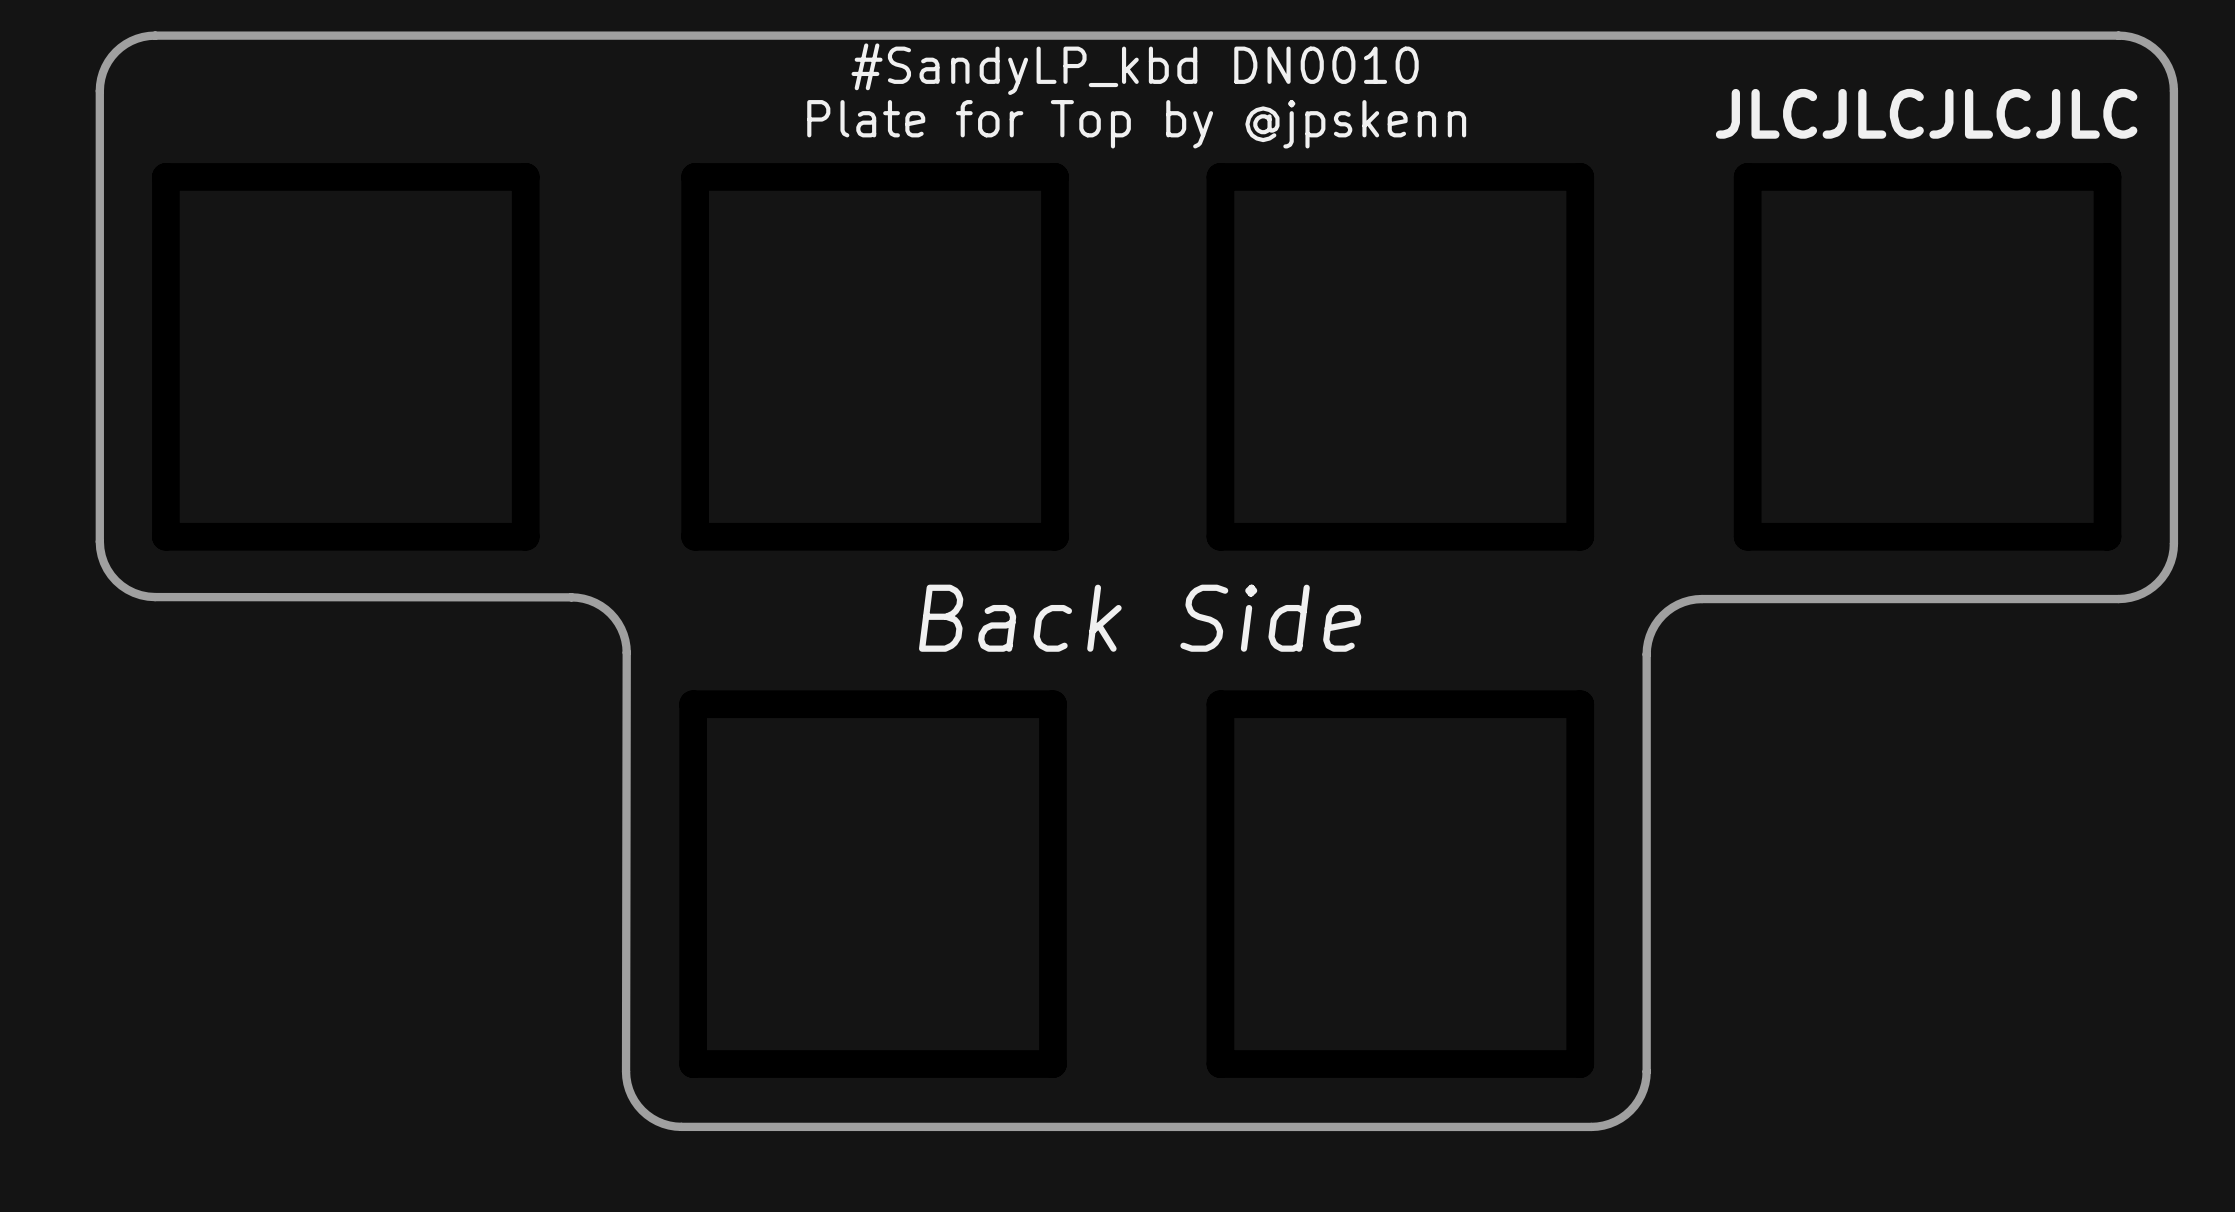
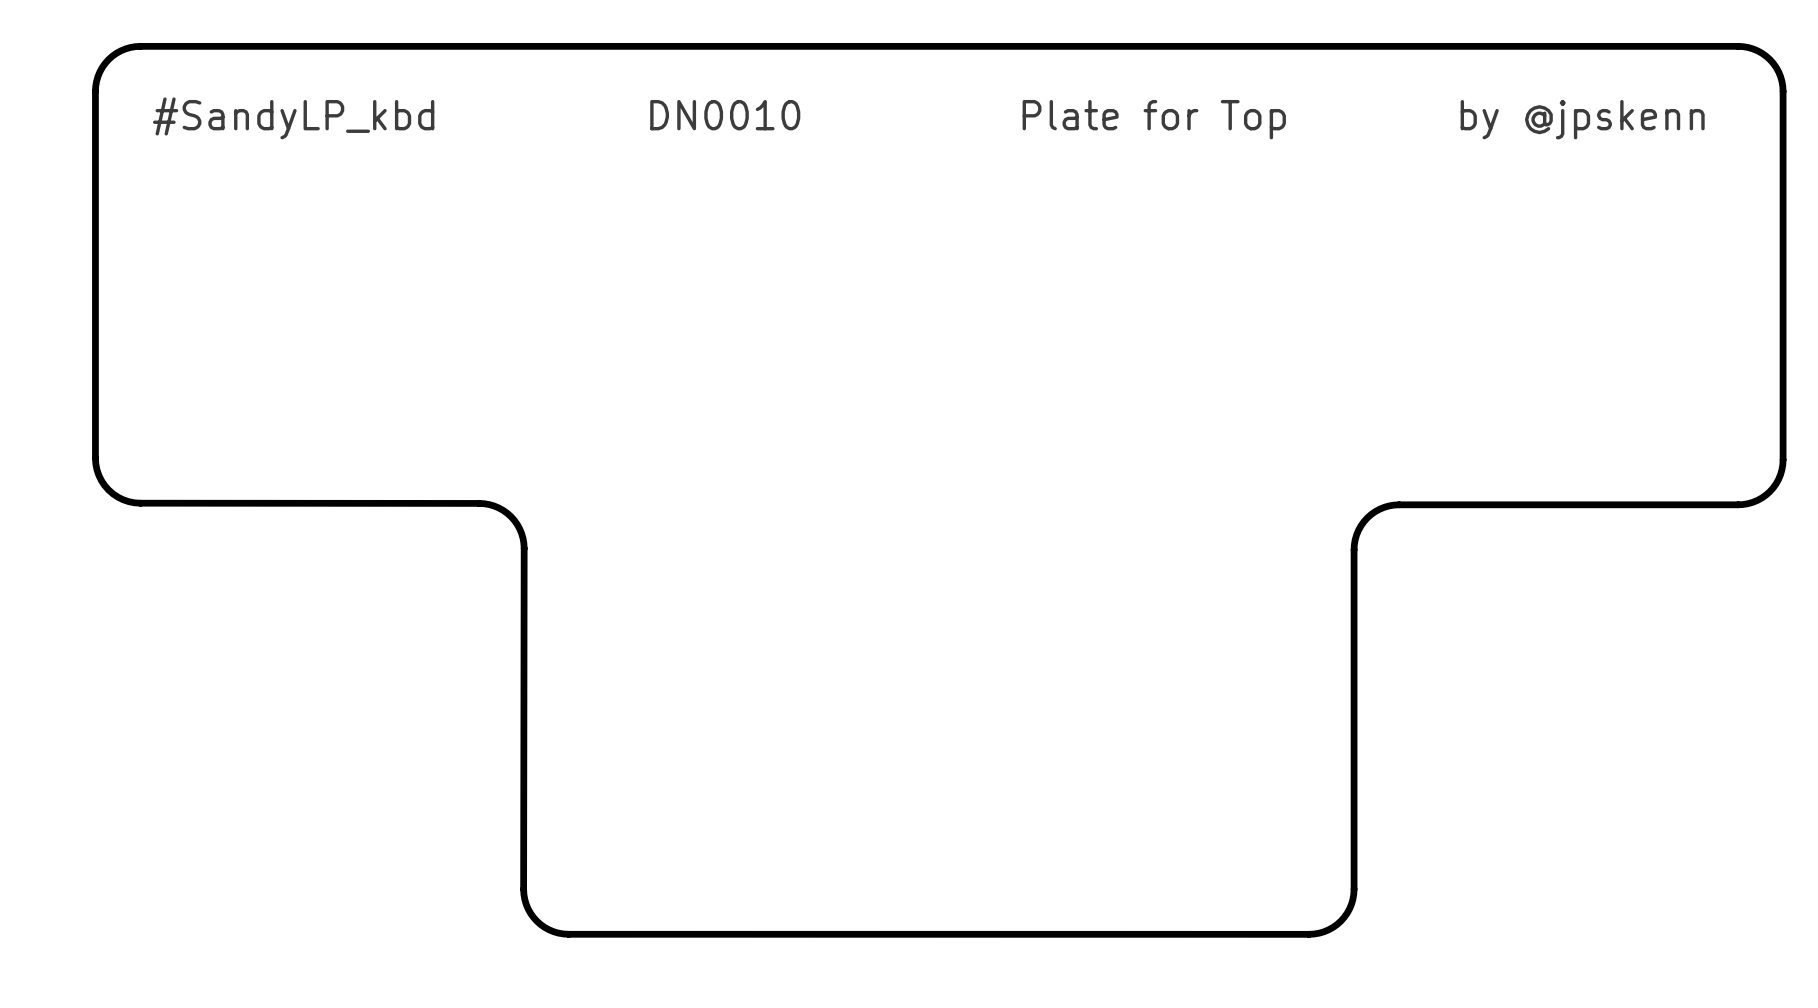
text: #SandyLP_kbd DN0010 (1135, 69) -> none
text: JLCJLCJLCJLC (1926, 113) -> by @jpskenn (1582, 119)
text: none -> DN0010 (725, 115)
text: none -> #SandyLP_kbd (293, 118)
text: Plate for Top by @jpskenn (1136, 124) -> Plate for Top (1154, 119)
text: Back Side (1140, 618) -> none

